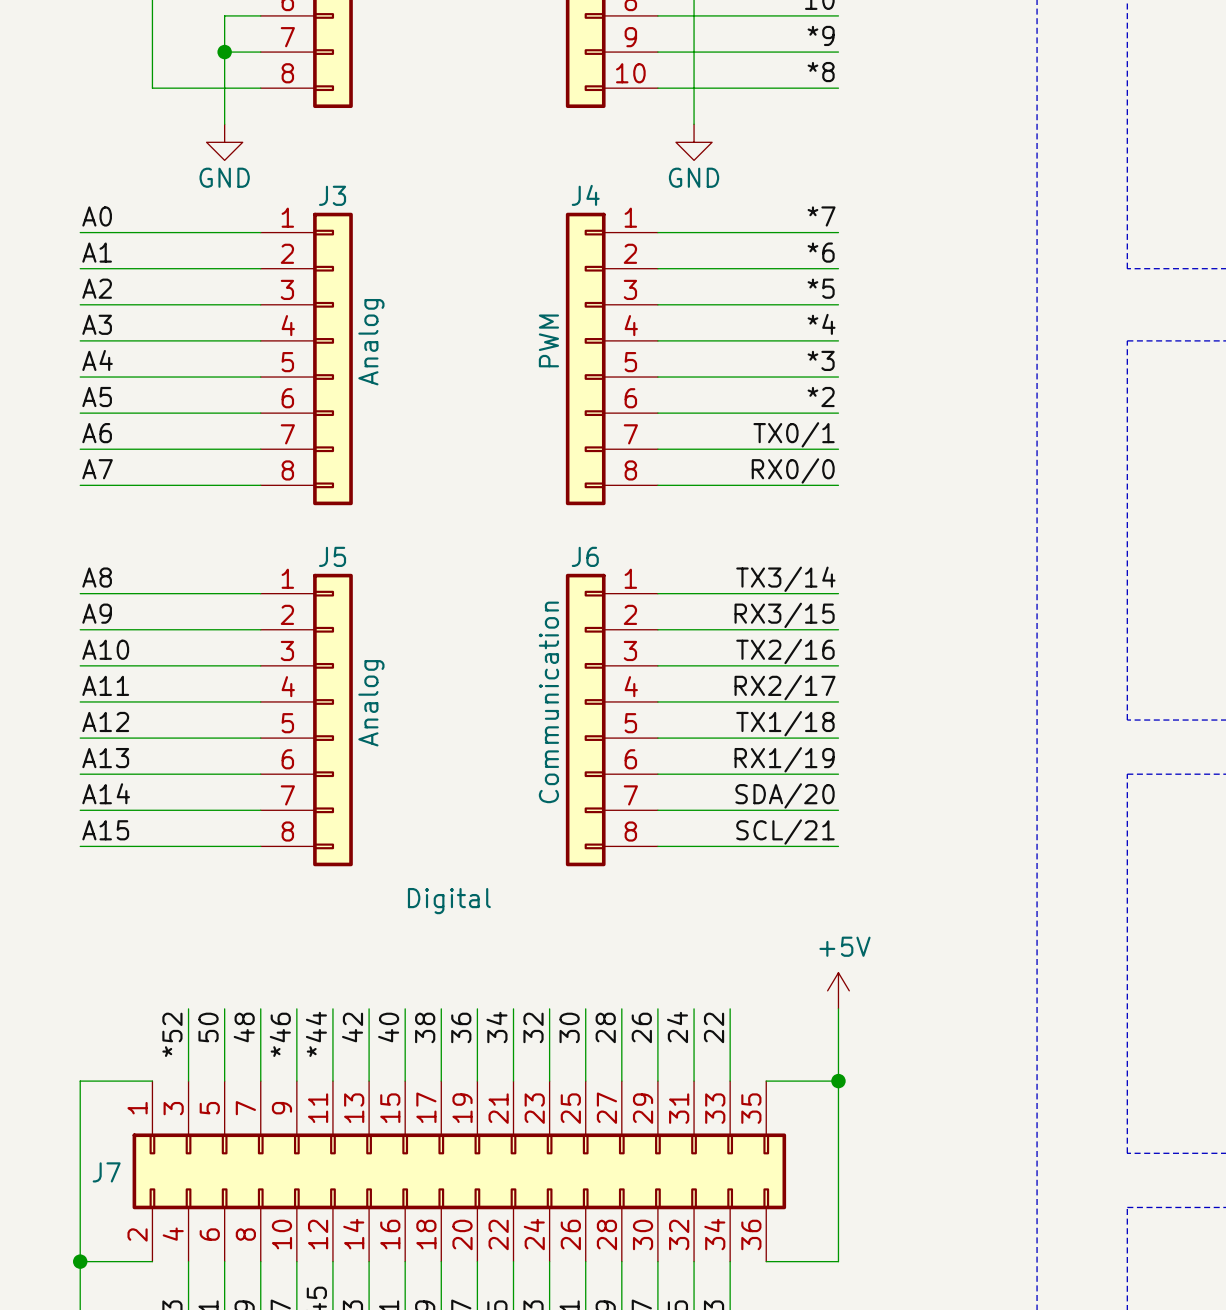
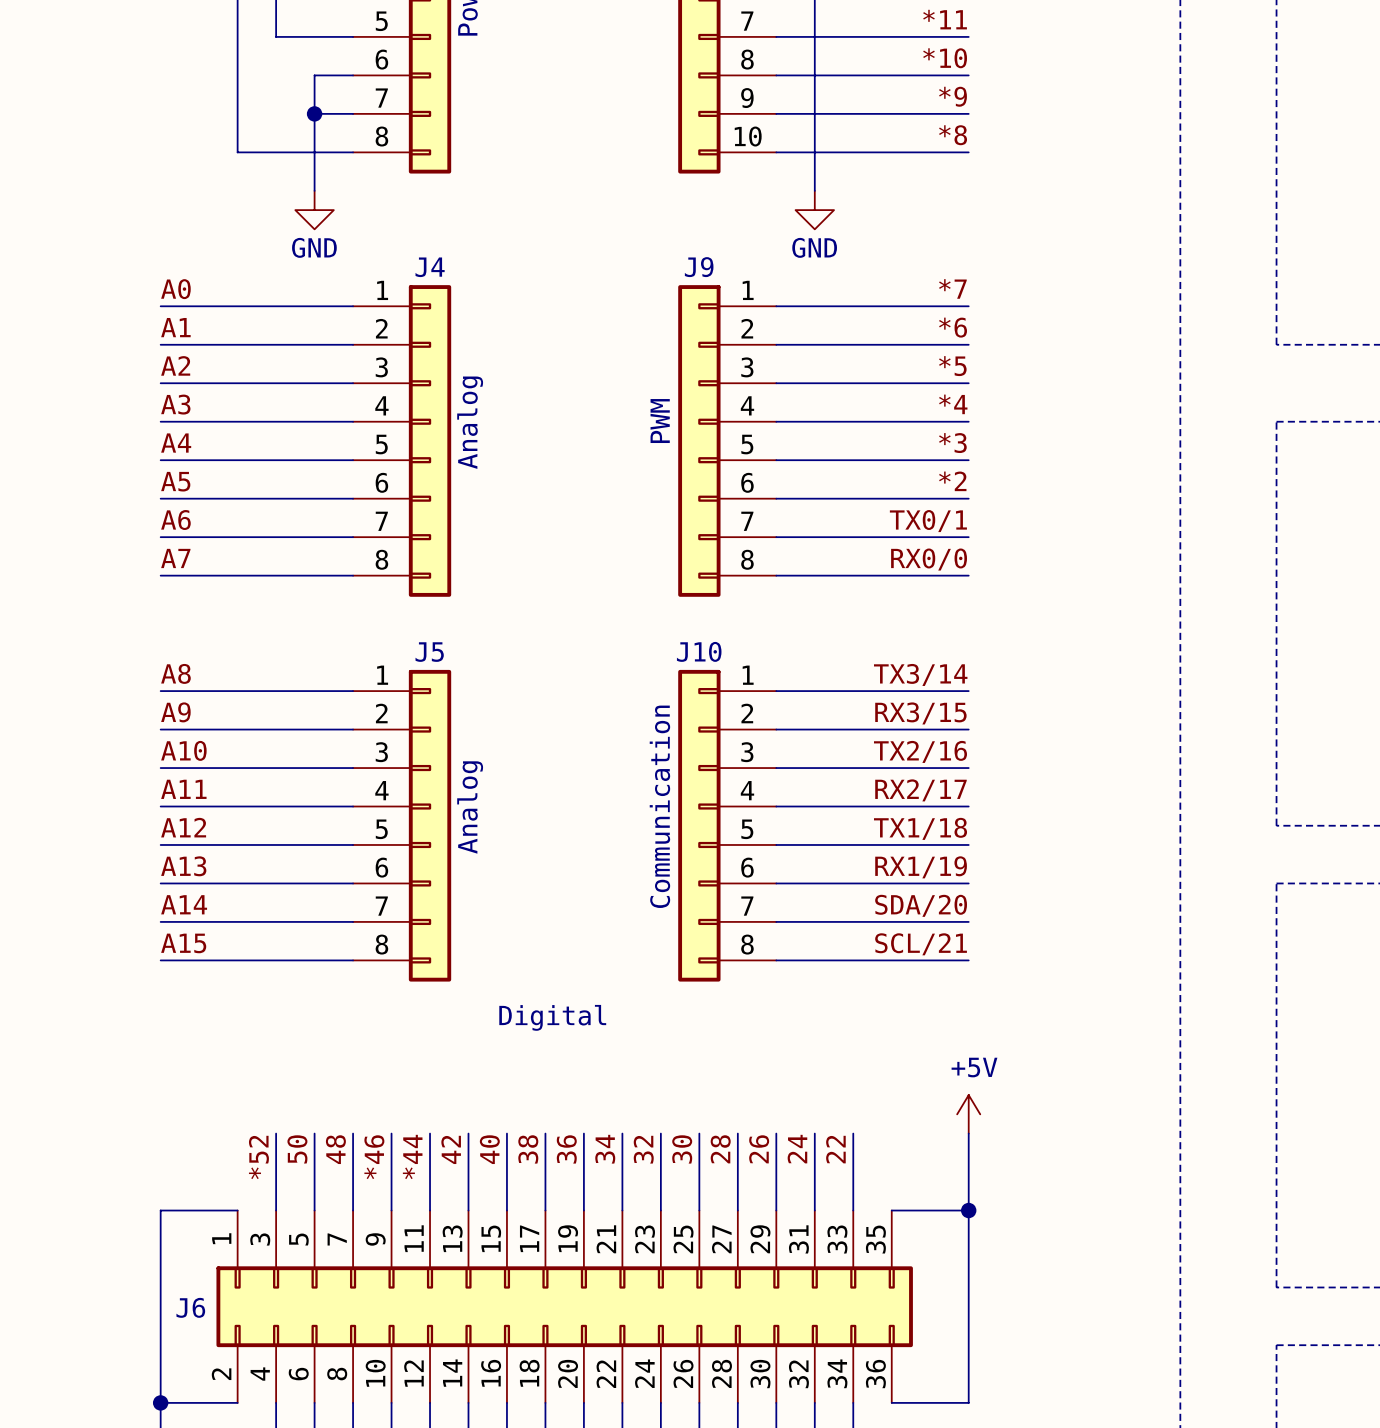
J3 name: J3 (332, 195) -> J4 (430, 267)
J4 name: J4 (585, 195) -> J9 (699, 267)
J6 name: J6 (585, 556) -> J10 (699, 651)
J7 name: J7 (106, 1172) -> J6 (190, 1307)

